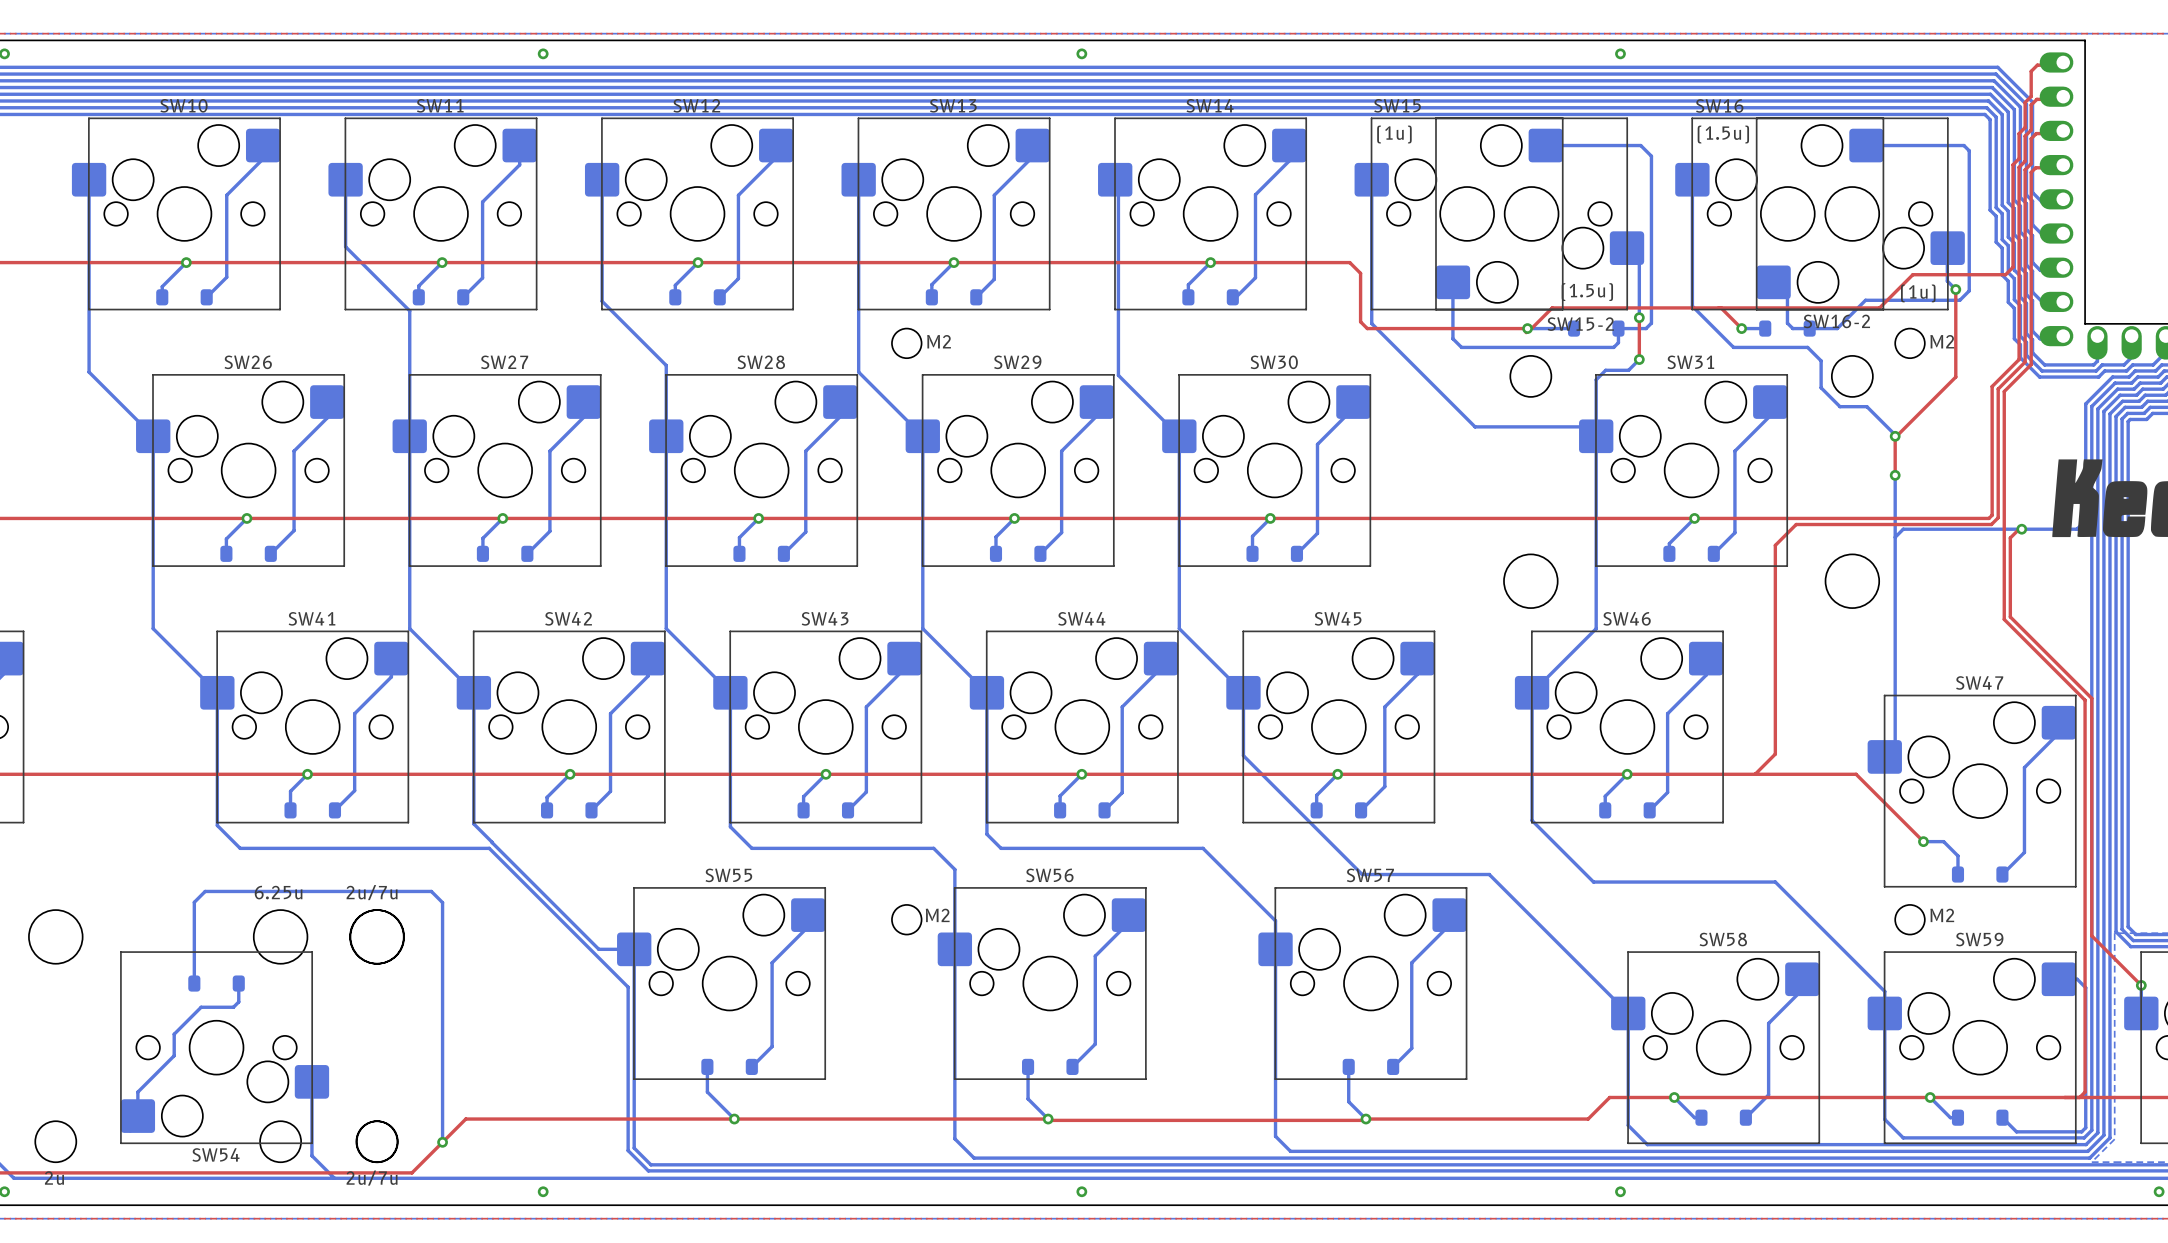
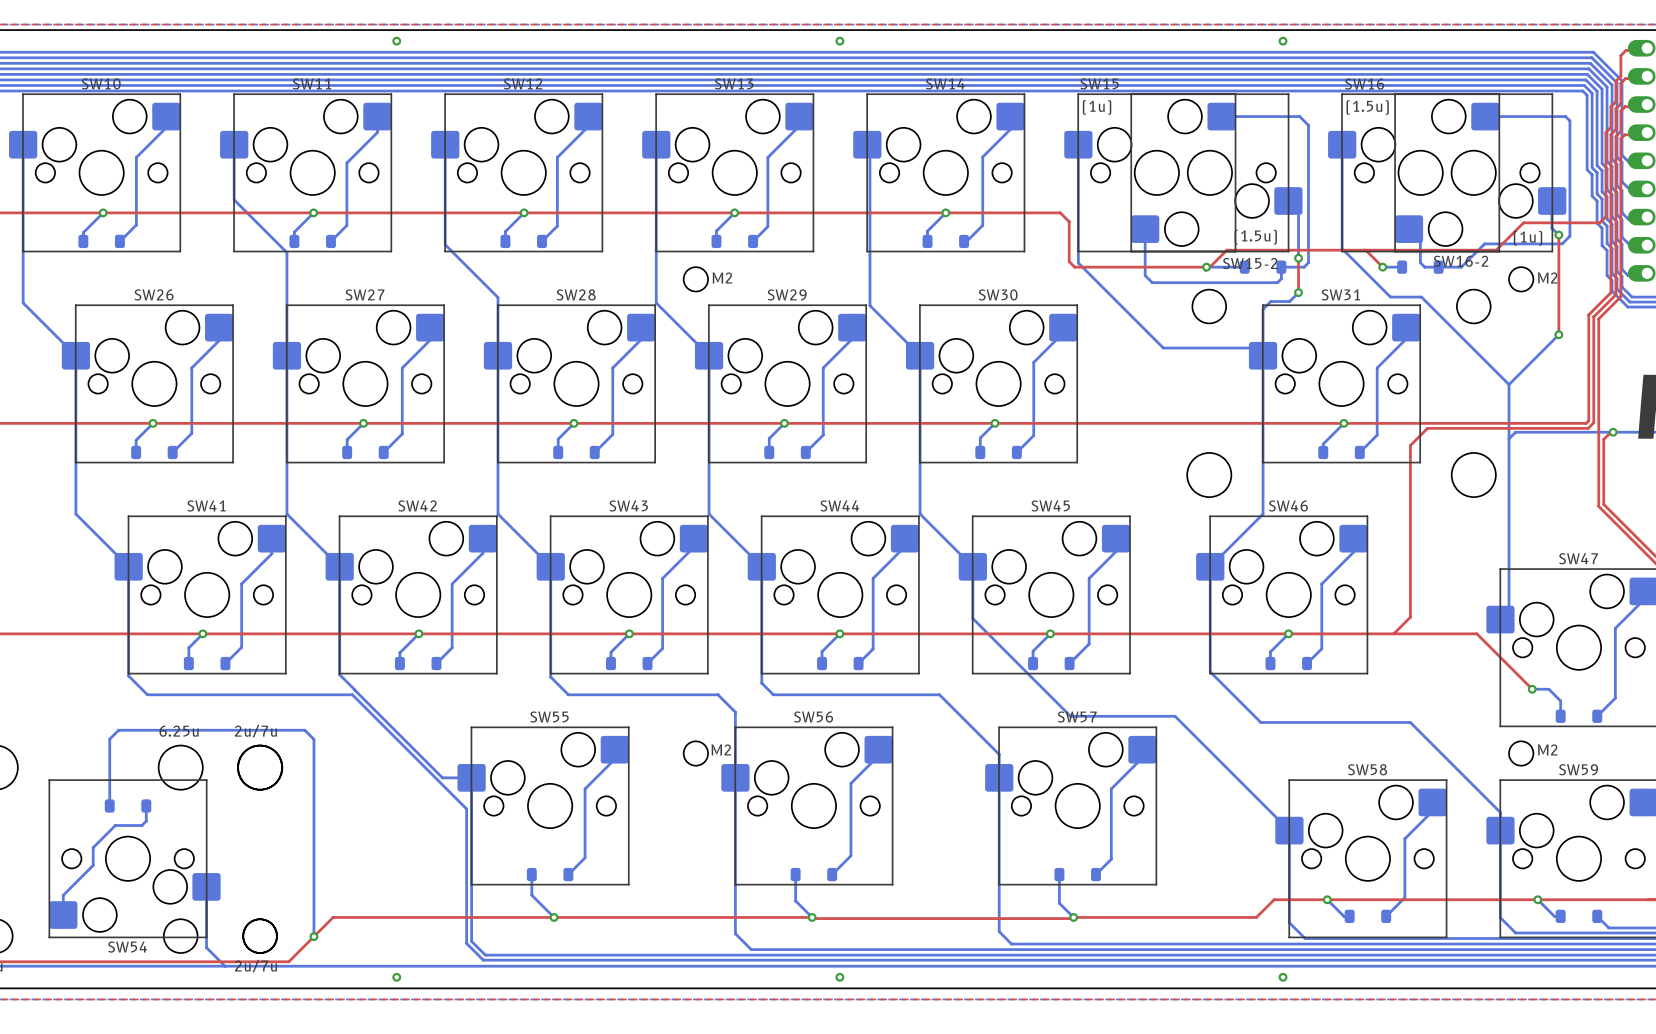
bottom track: (1733, 347) (1807, 347) (1821, 360) (1821, 387) (1839, 406) (1866, 406) (1895, 436) -> (1376, 282) (1390, 297) (1421, 297) (1509, 384) (1558, 334)
top track: (1955, 377) (1895, 437) (1895, 475) -> (1558, 307) (1558, 334)
via: none -> (1558, 334)
via: (1895, 436) -> none
via: (1895, 475) -> none

